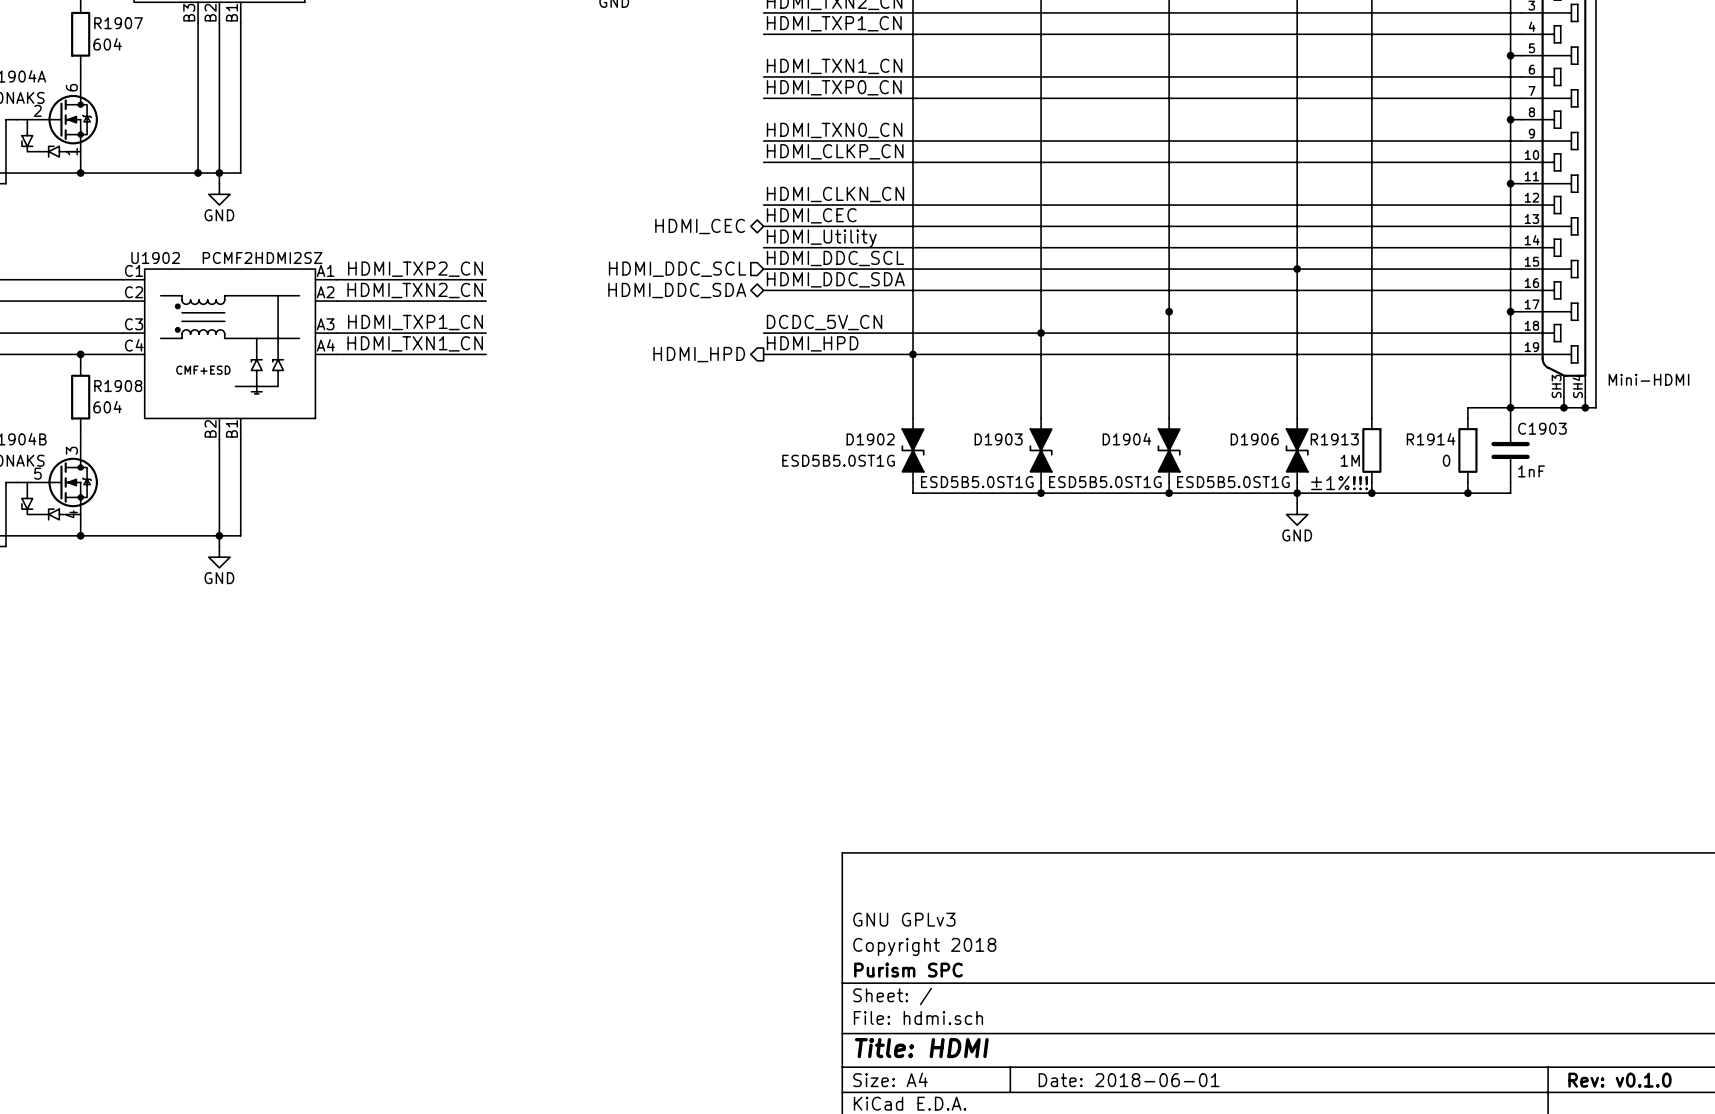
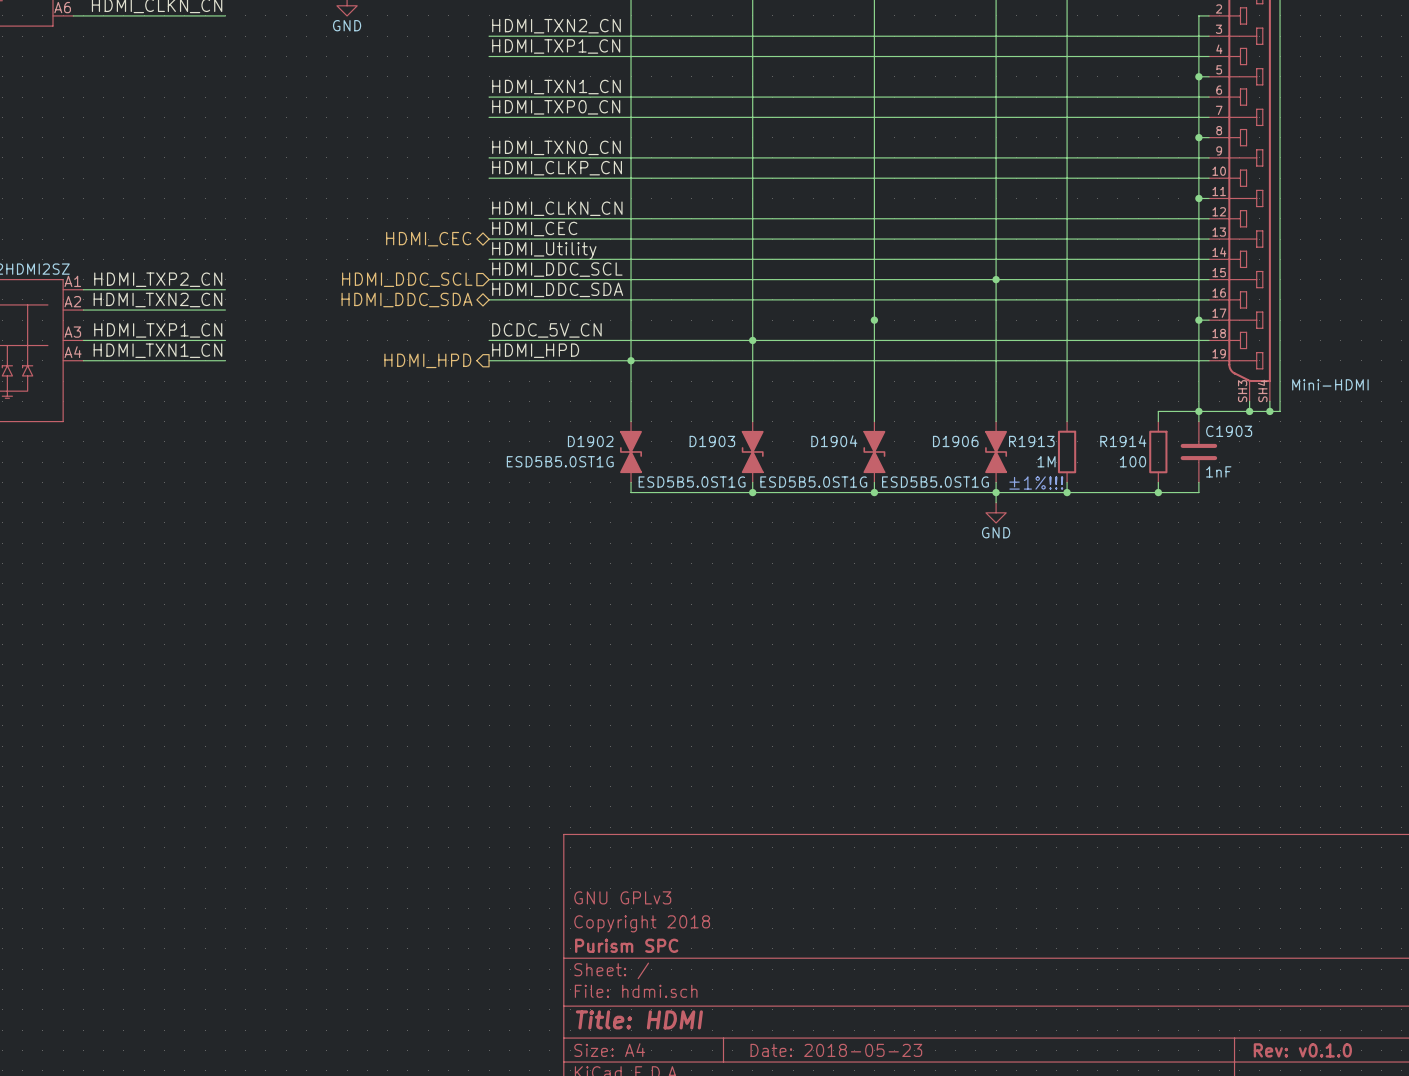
R1914 value: 0 (1446, 460) -> 100 (1132, 461)
title block: Date: 2018-06-01 (1129, 1080) -> Date: 2018-05-23 (836, 1050)

